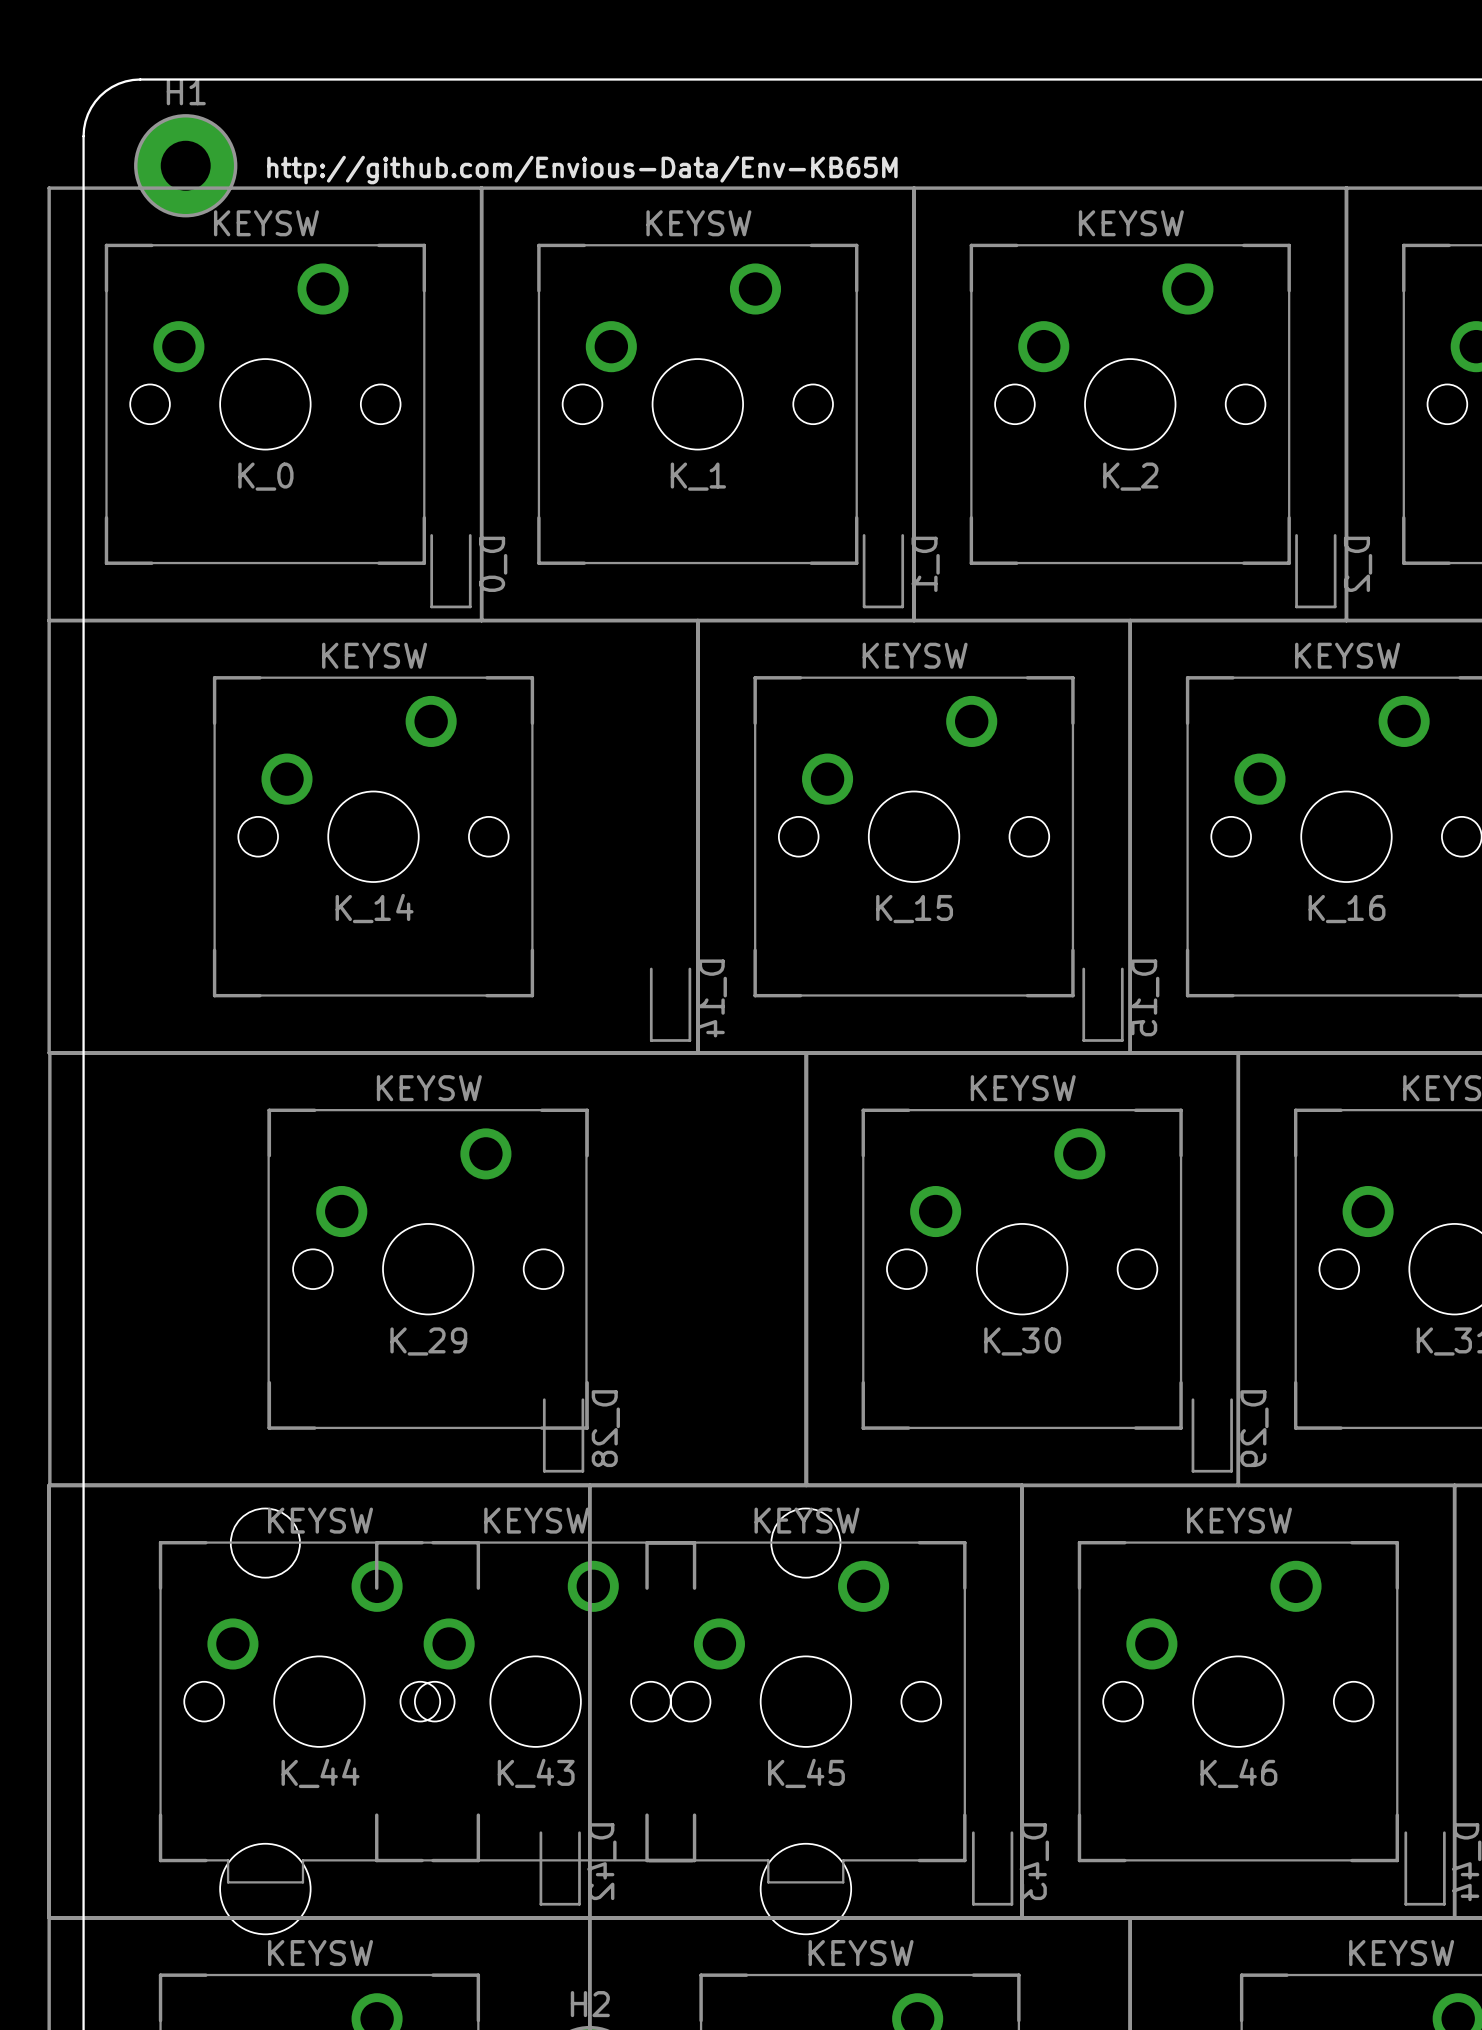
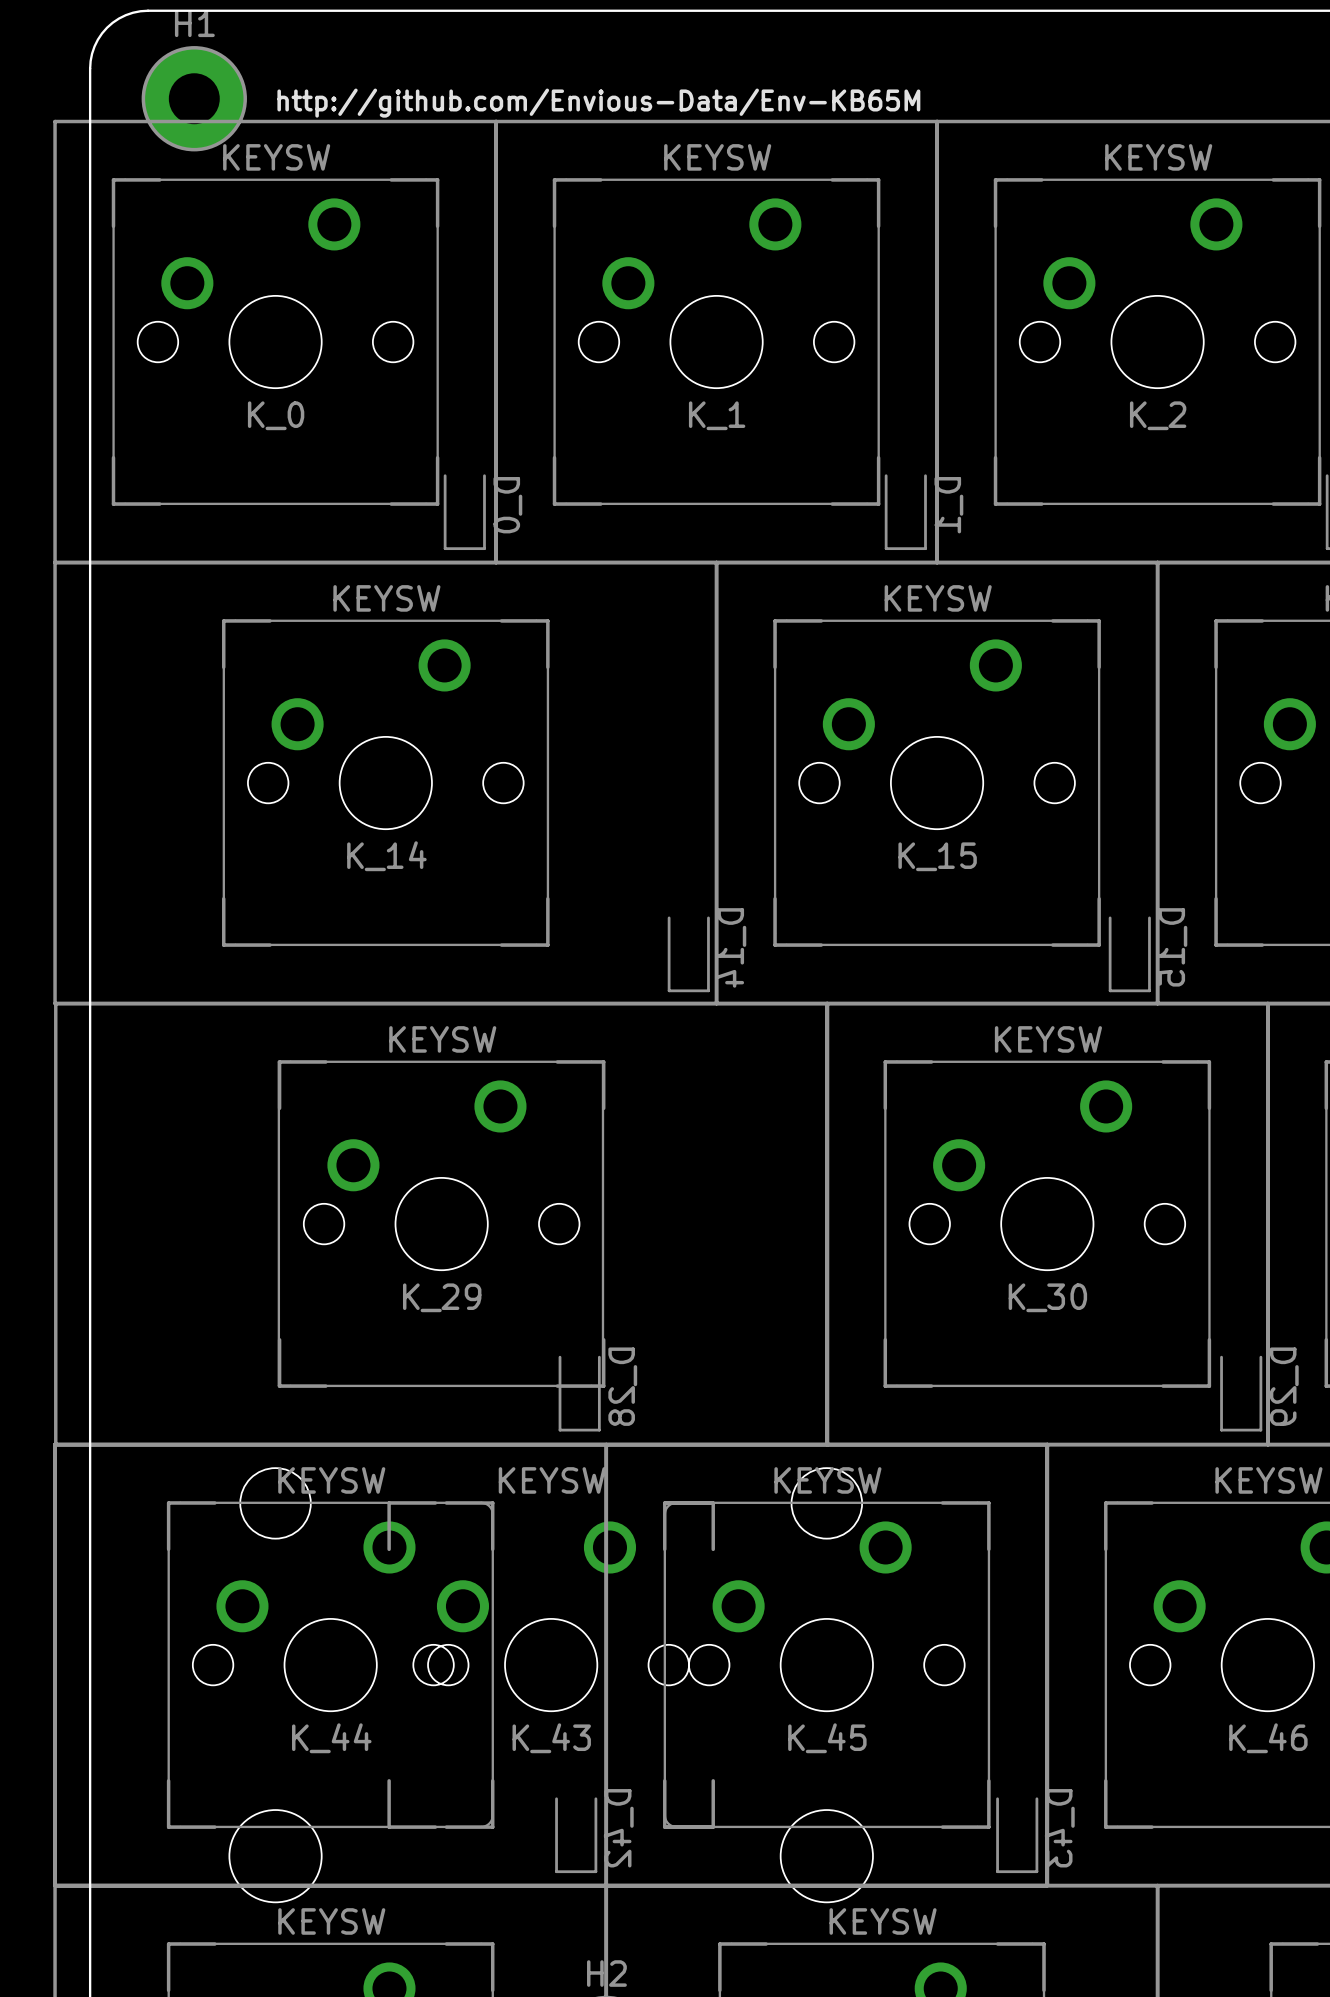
line: (467, 1542) (658, 1542) -> (481, 1502) (489, 1506) (492, 1514) (492, 1815) (489, 1823) (481, 1826)
line: (228, 1860) (228, 1882) (302, 1882) (302, 1860) -> (237, 1826) (313, 1826)
line: (467, 1860) (658, 1860) -> (676, 1502) (668, 1506) (664, 1514) (664, 1815) (668, 1823) (676, 1826)
line: (768, 1860) (768, 1882) (843, 1882) (843, 1860) -> (788, 1826) (864, 1826)

